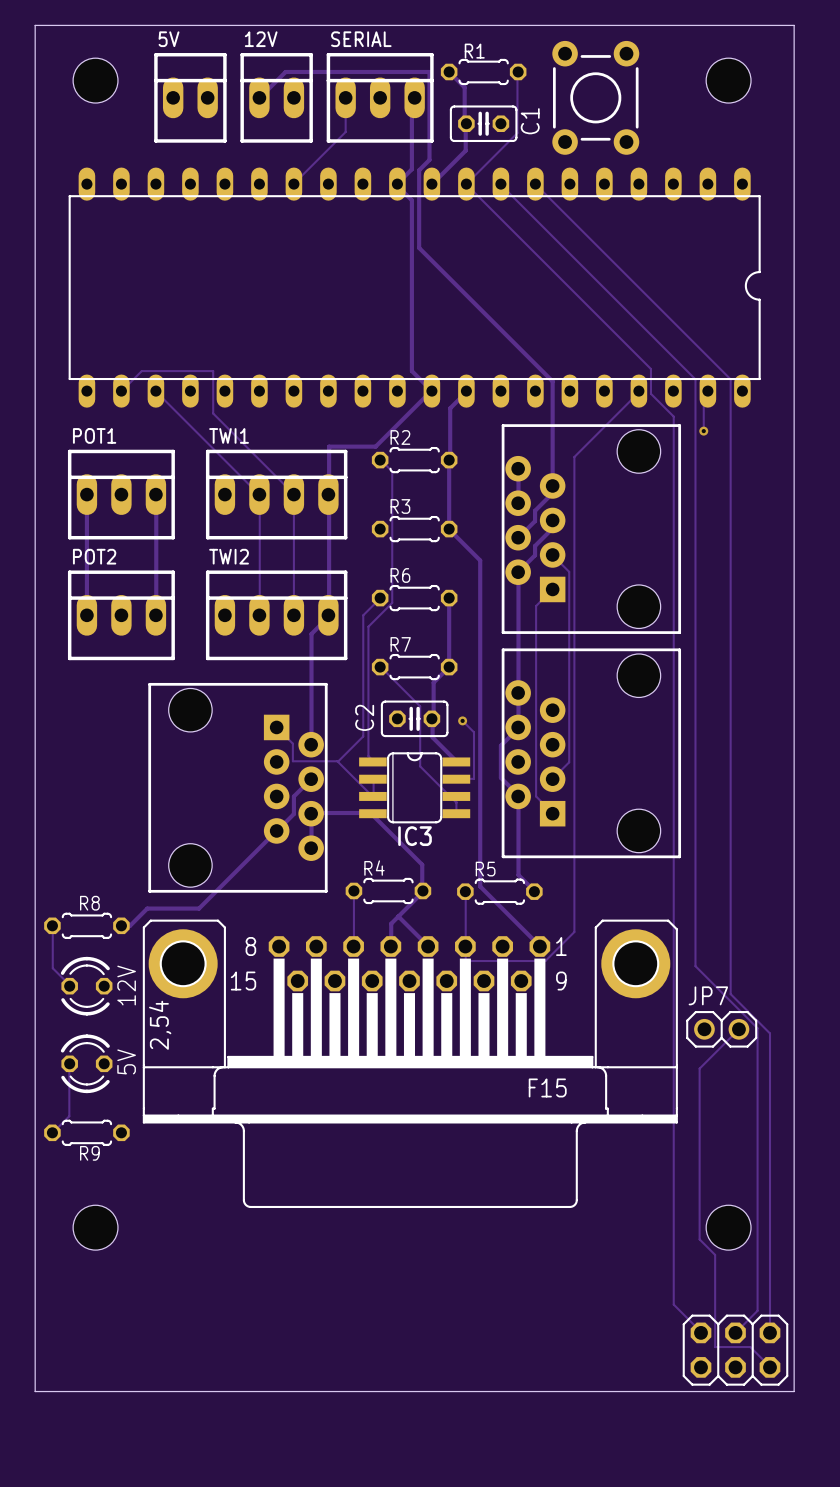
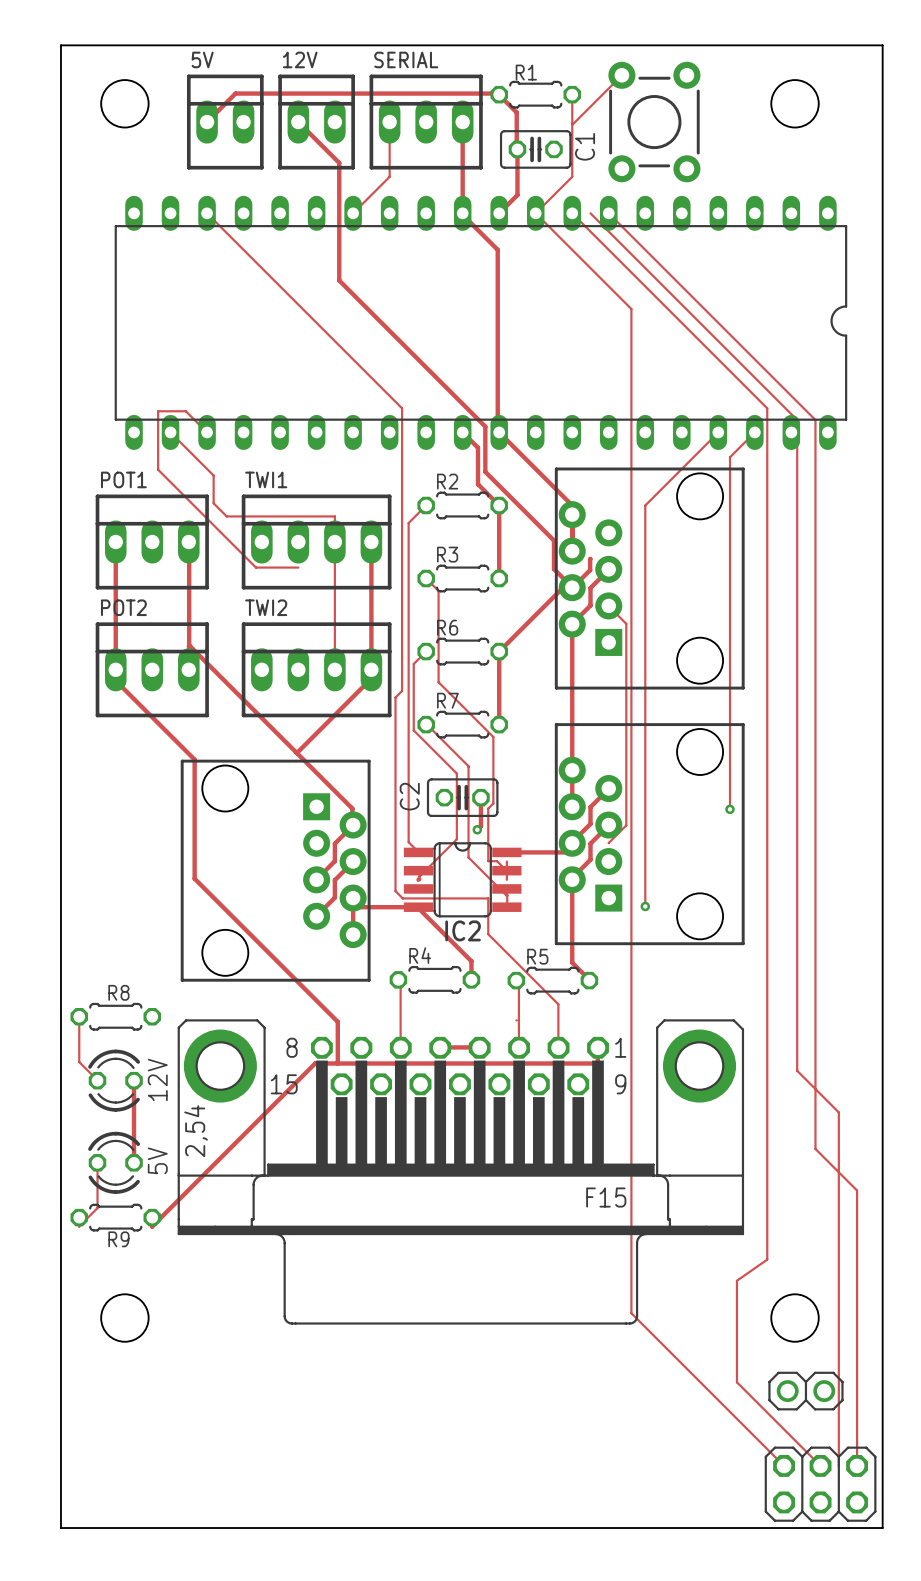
board edge: (794, 25) (794, 1391) (35, 1391) -> (864, 45) (882, 45) (882, 1528) (60, 1528) (60, 1491)
track: none -> (621, 75) (572, 124)
track: (449, 71) (464, 87) (465, 150) (431, 184) -> none
track: (518, 71) (517, 133) (466, 184) (650, 369) (650, 393) (673, 416) (673, 1192) -> (572, 213) (767, 408) (767, 1259) (736, 1280)
track: none -> (572, 94) (572, 176) (535, 213) (631, 309) (631, 1313) (784, 1465)
track: none -> (207, 122) (235, 93) (497, 93) (516, 112) (517, 149) (517, 195) (499, 213)
track: (259, 97) (285, 71) (429, 71) (429, 159) (419, 170) (419, 247) (552, 381) (551, 494) (535, 510) -> (298, 122) (339, 162) (339, 280) (485, 426) (485, 471) (553, 540) (553, 569) (572, 587) (566, 584) (499, 651)
track: (414, 97) (411, 99) (411, 169) (397, 185) (411, 200) (411, 371) (431, 391) -> (462, 122) (462, 214) (497, 249) (497, 430) (572, 505) (572, 551)
track: (345, 132) (293, 184) -> (389, 158) (389, 176) (353, 213)
track: none -> (207, 213) (402, 408) (402, 691) (395, 697) (395, 891) (402, 898) (488, 898) (488, 934) (558, 1004) (558, 1047)
track: (500, 184) (695, 379) (695, 966) (757, 1028) (757, 1310) (735, 1332) -> none
track: none -> (608, 213) (815, 420) (815, 1148) (857, 1190) (857, 1465)
part position: (414, 287) -> (480, 322)
track: (141, 371) (121, 391) -> (173, 411) (158, 411) (158, 469) (255, 567) (298, 567)
track: (153, 371) (213, 371) (213, 413) (293, 494) -> (170, 432) (213, 475) (213, 503) (226, 516) (334, 516) (334, 541)
track: none -> (185, 411) (207, 432)
track: (431, 390) (375, 446) (329, 446) (329, 616) (311, 633) (311, 744) -> none
track: (155, 391) (259, 495) (259, 615) -> none
track: (466, 391) (450, 408) (449, 460) -> (462, 432) (478, 447) (478, 484) (499, 505)
track: (638, 391) (574, 456) (574, 932) (545, 961) (465, 961) (465, 891) -> none
track: none -> (718, 432) (645, 505) (645, 906)
track: none -> (754, 432) (730, 457) (730, 809)
track: (707, 391) (703, 395) (703, 431) -> none
via: (703, 431) -> none
track: (380, 460) (392, 471) (392, 602) (368, 626) -> (426, 651) (413, 663) (413, 681)
track: none -> (426, 505) (408, 523) (408, 842) (418, 852)
track: none -> (371, 542) (371, 678) (296, 753)
track: (552, 520) (552, 528) (535, 545) (535, 555) (518, 572) (518, 727) (500, 745) (500, 777) (518, 795) (518, 875) (534, 891) -> (608, 569) (590, 588) (590, 605) (572, 623) (572, 806)
track: none -> (426, 578) (438, 590) (438, 682) (493, 737) (493, 803) (488, 808) (488, 861) (497, 861) (506, 870)
track: (449, 529) (480, 560) (480, 886) (539, 946) -> none
track: (552, 589) (536, 606) (536, 796) (552, 813) -> none
track: none -> (188, 646) (352, 808) (353, 825) (334, 843) (334, 861) (316, 879)
track: (380, 598) (363, 615) (363, 736) (337, 761) -> none
track: none -> (115, 669) (115, 680) (194, 759) (194, 878) (337, 1021) (337, 1063)
track: (449, 667) (433, 682) (432, 737) (456, 761) -> none
track: (368, 672) (368, 756) (372, 761) -> (413, 730) (456, 773) (456, 839) (418, 876)
C2 position: (414, 718) -> (462, 797)
track: (462, 720) (474, 732) (474, 778) (456, 779) -> none
via position: (462, 720) -> (477, 829)
track: (276, 727) (292, 743) (292, 761) (337, 761) (373, 796) (372, 779) -> none
track: none -> (608, 788) (590, 807) (590, 823) (572, 841) (572, 852) (506, 852)
track: none -> (480, 797) (480, 826) (477, 829)
via: none -> (730, 809)
part position: (591, 753) -> (649, 834)
track: none -> (608, 825) (590, 843) (590, 859) (572, 877) (572, 962) (589, 980)
track: (420, 766) (456, 802) -> (468, 829) (468, 857) (507, 895)
track: (311, 779) (293, 796) (293, 814) (199, 908) (147, 908) (130, 925) (121, 925) -> none
part position: (237, 787) -> (275, 870)
IC3: (414, 787) -> none
track: none -> (353, 861) (334, 880) (334, 897) (316, 916)
IC2: none -> (462, 879)
track: none -> (506, 888) (506, 907)
via: none -> (645, 906)
track: none -> (418, 907) (471, 961) (471, 979)
track: none -> (418, 907) (354, 907) (353, 898) (353, 934)
track: (311, 848) (311, 813) (371, 813) (422, 864) (423, 891) (391, 923) (390, 946) -> none
track: (353, 890) (353, 908) -> none
R4 position: (388, 890) -> (434, 979)
R5 position: (499, 891) -> (552, 980)
track: (353, 908) (353, 946) -> (398, 980) (400, 982) (400, 1047)
track: none -> (516, 980) (518, 983) (519, 1047)
track: (398, 916) (428, 946) -> none
track: (52, 925) (52, 968) (69, 986) -> none
R8 position: (86, 925) -> (115, 1016)
track: none -> (79, 1016) (79, 1062) (97, 1080)
track: none -> (440, 1047) (479, 1047)
track: none -> (597, 1047) (597, 1063) (315, 1063) (152, 1226)
text position: 12V (126, 985) -> 12V (157, 1079)
part position: (86, 986) -> (115, 1080)
track: none -> (134, 1080) (134, 1162)
JP7: (721, 1029) -> none
track: (738, 1029) (699, 1068) (699, 1239) (715, 1254) (715, 1347) (750, 1347) (769, 1366) -> (838, 1429) (838, 1465)
text position: 5V (126, 1061) -> 5V (157, 1160)
track: (69, 1063) (69, 1116) (52, 1132) -> none
part position: (86, 1063) -> (115, 1162)
part position: (410, 1063) -> (460, 1171)
track: none -> (97, 1162) (97, 1208) (79, 1226)
track: (673, 1288) (673, 1304) (701, 1332) -> (736, 1382) (820, 1465)
part: none -> (805, 1391)
part position: (735, 1350) -> (820, 1484)

